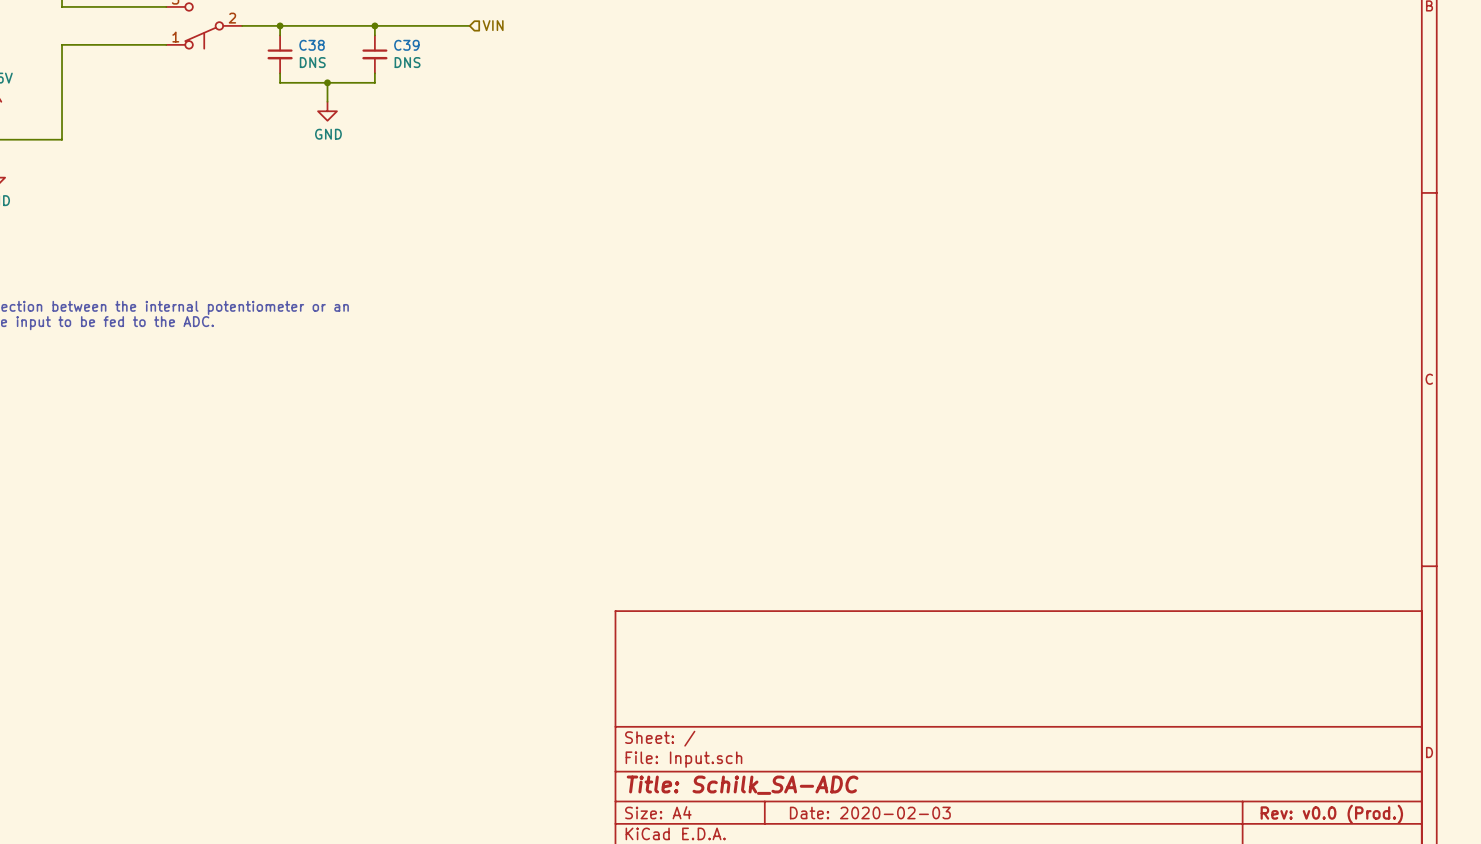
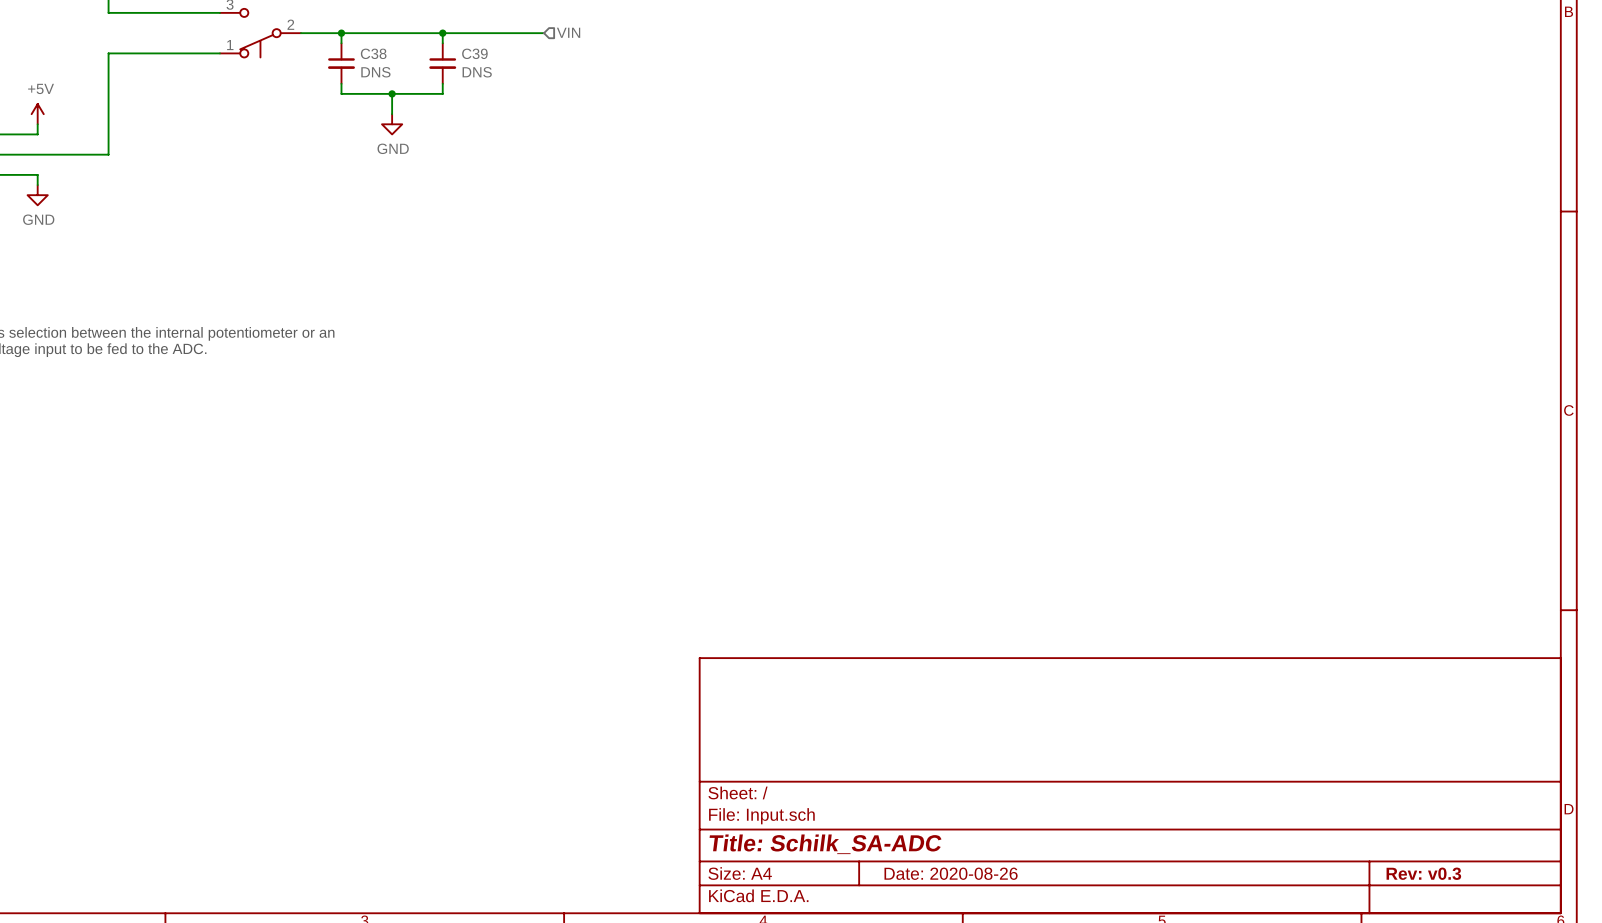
title block: Date: 2020-02-03 (870, 813) -> Date: 2020-08-26 (951, 873)
title block: Rev: v0.0 (Prod.) (1331, 814) -> Rev: v0.3 (1423, 873)

